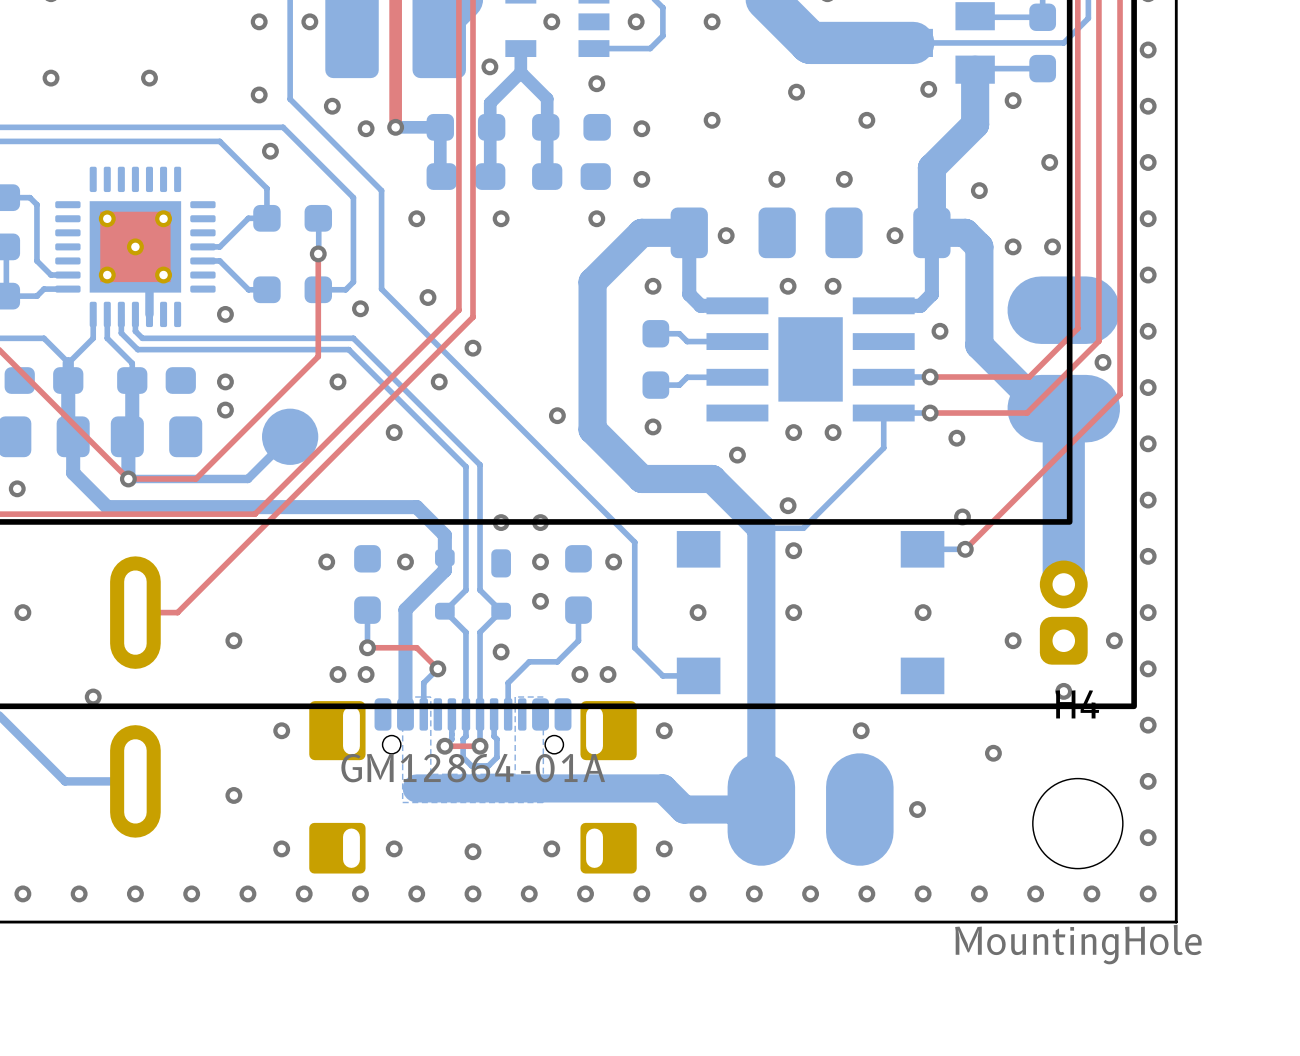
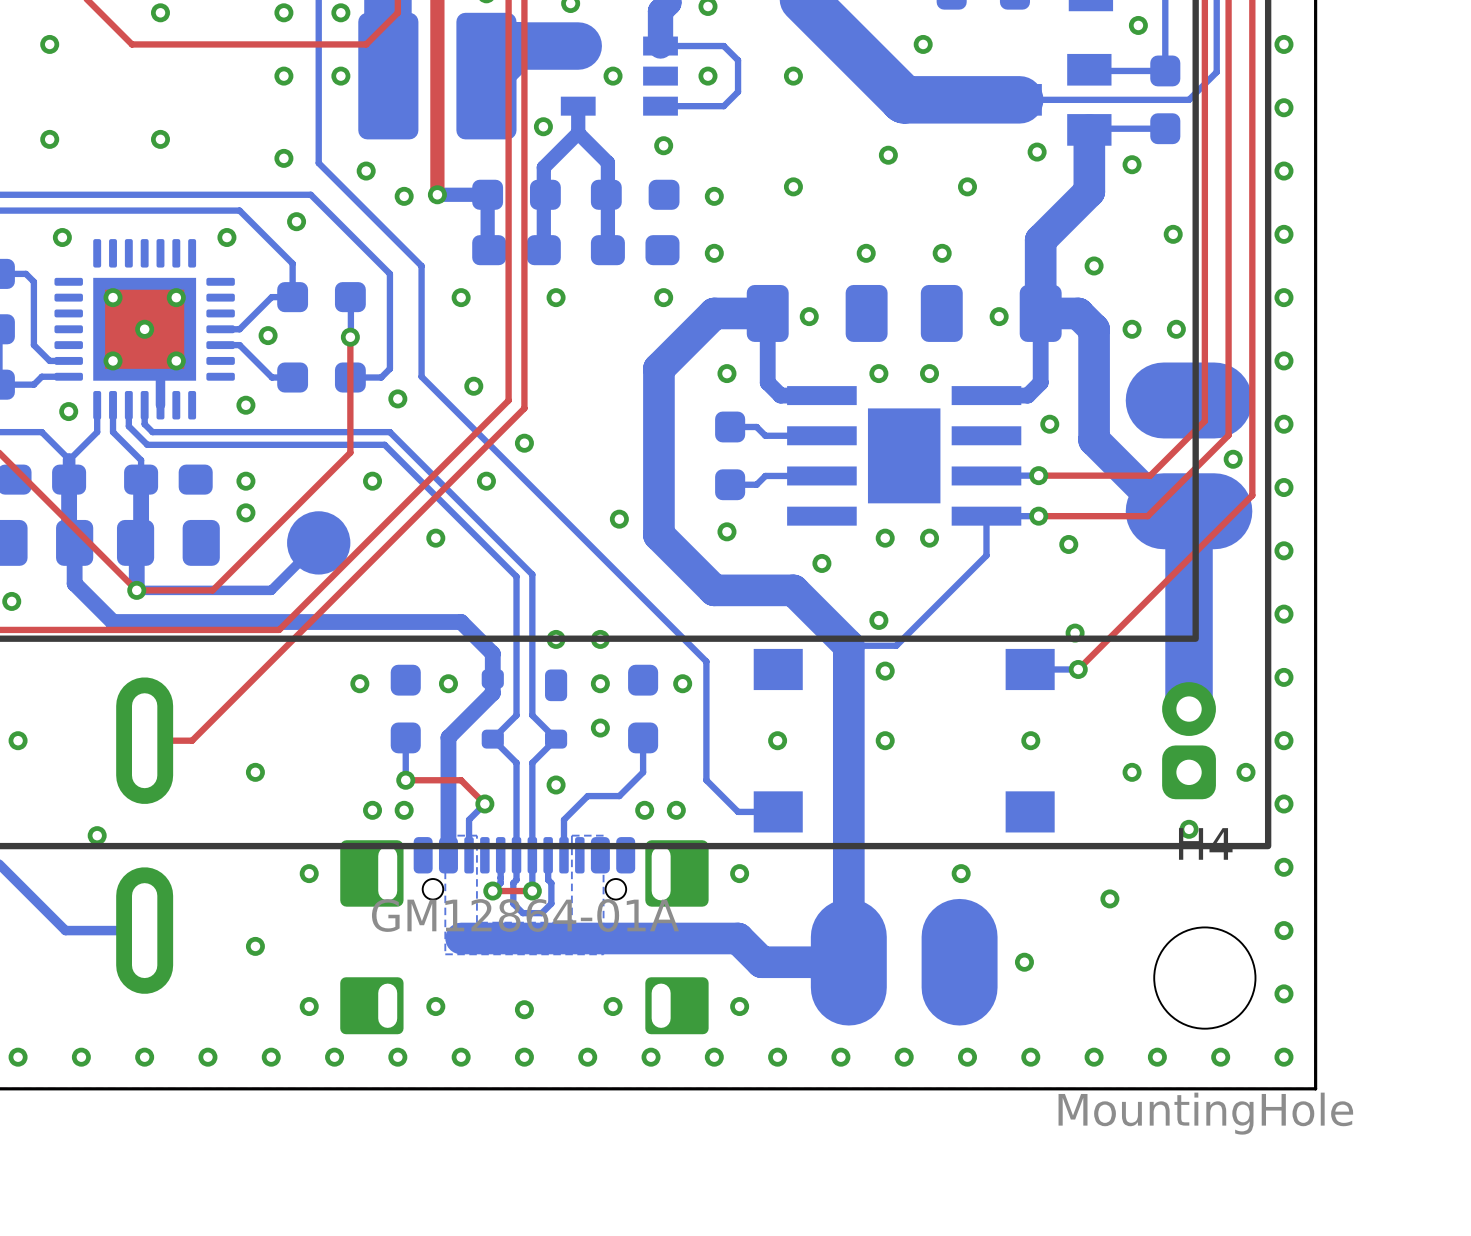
via: none -> (62, 237)
via: none -> (226, 237)
via: none -> (268, 335)
via: none -> (68, 411)

